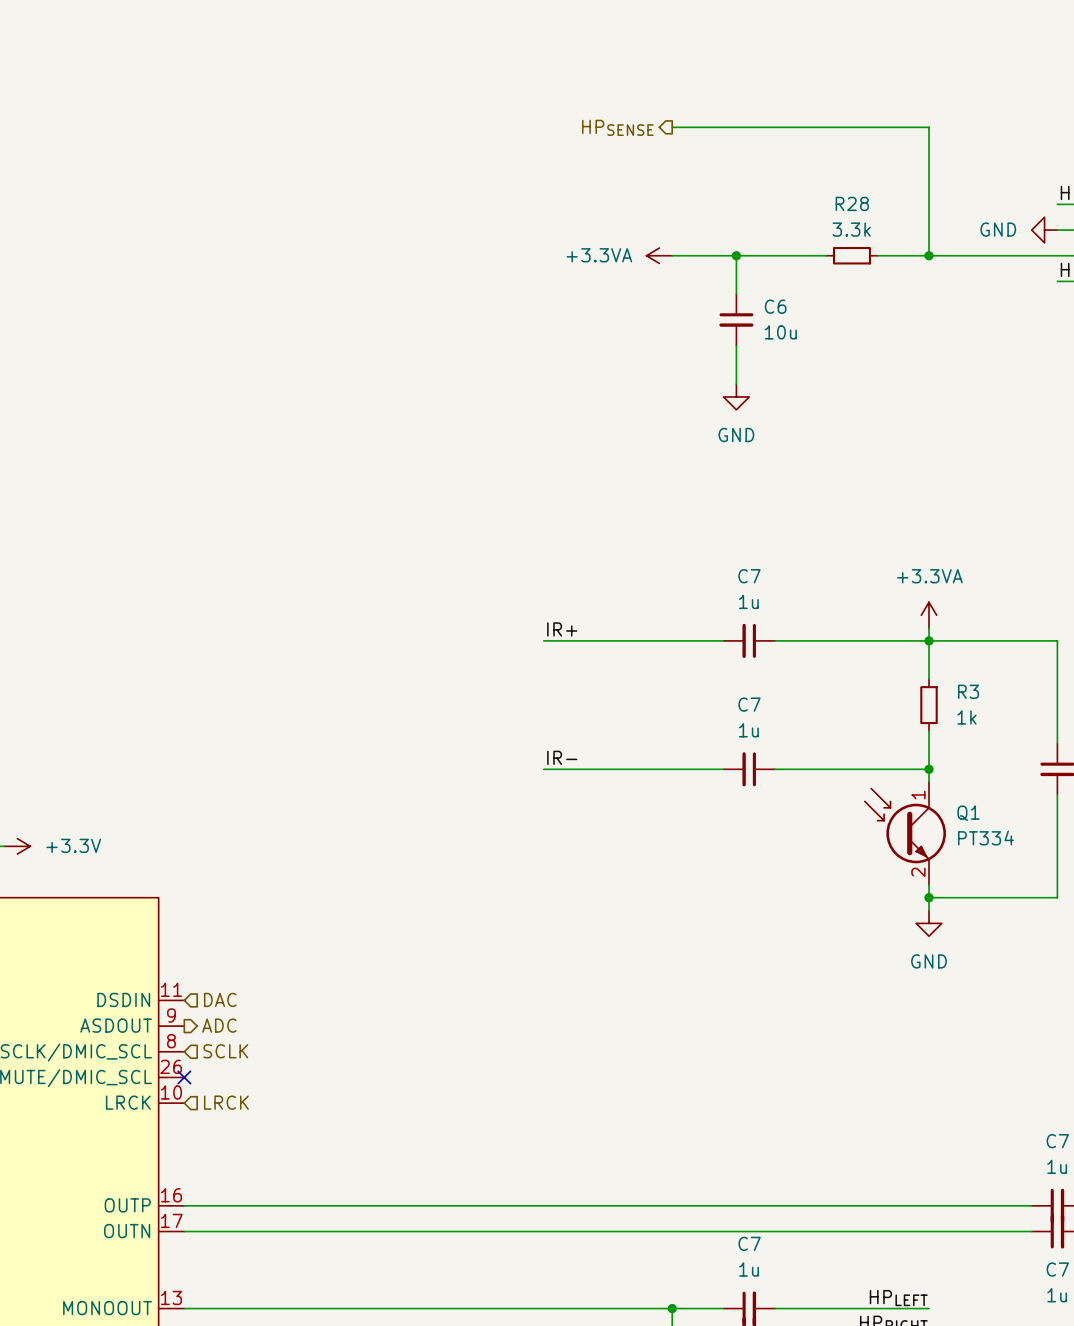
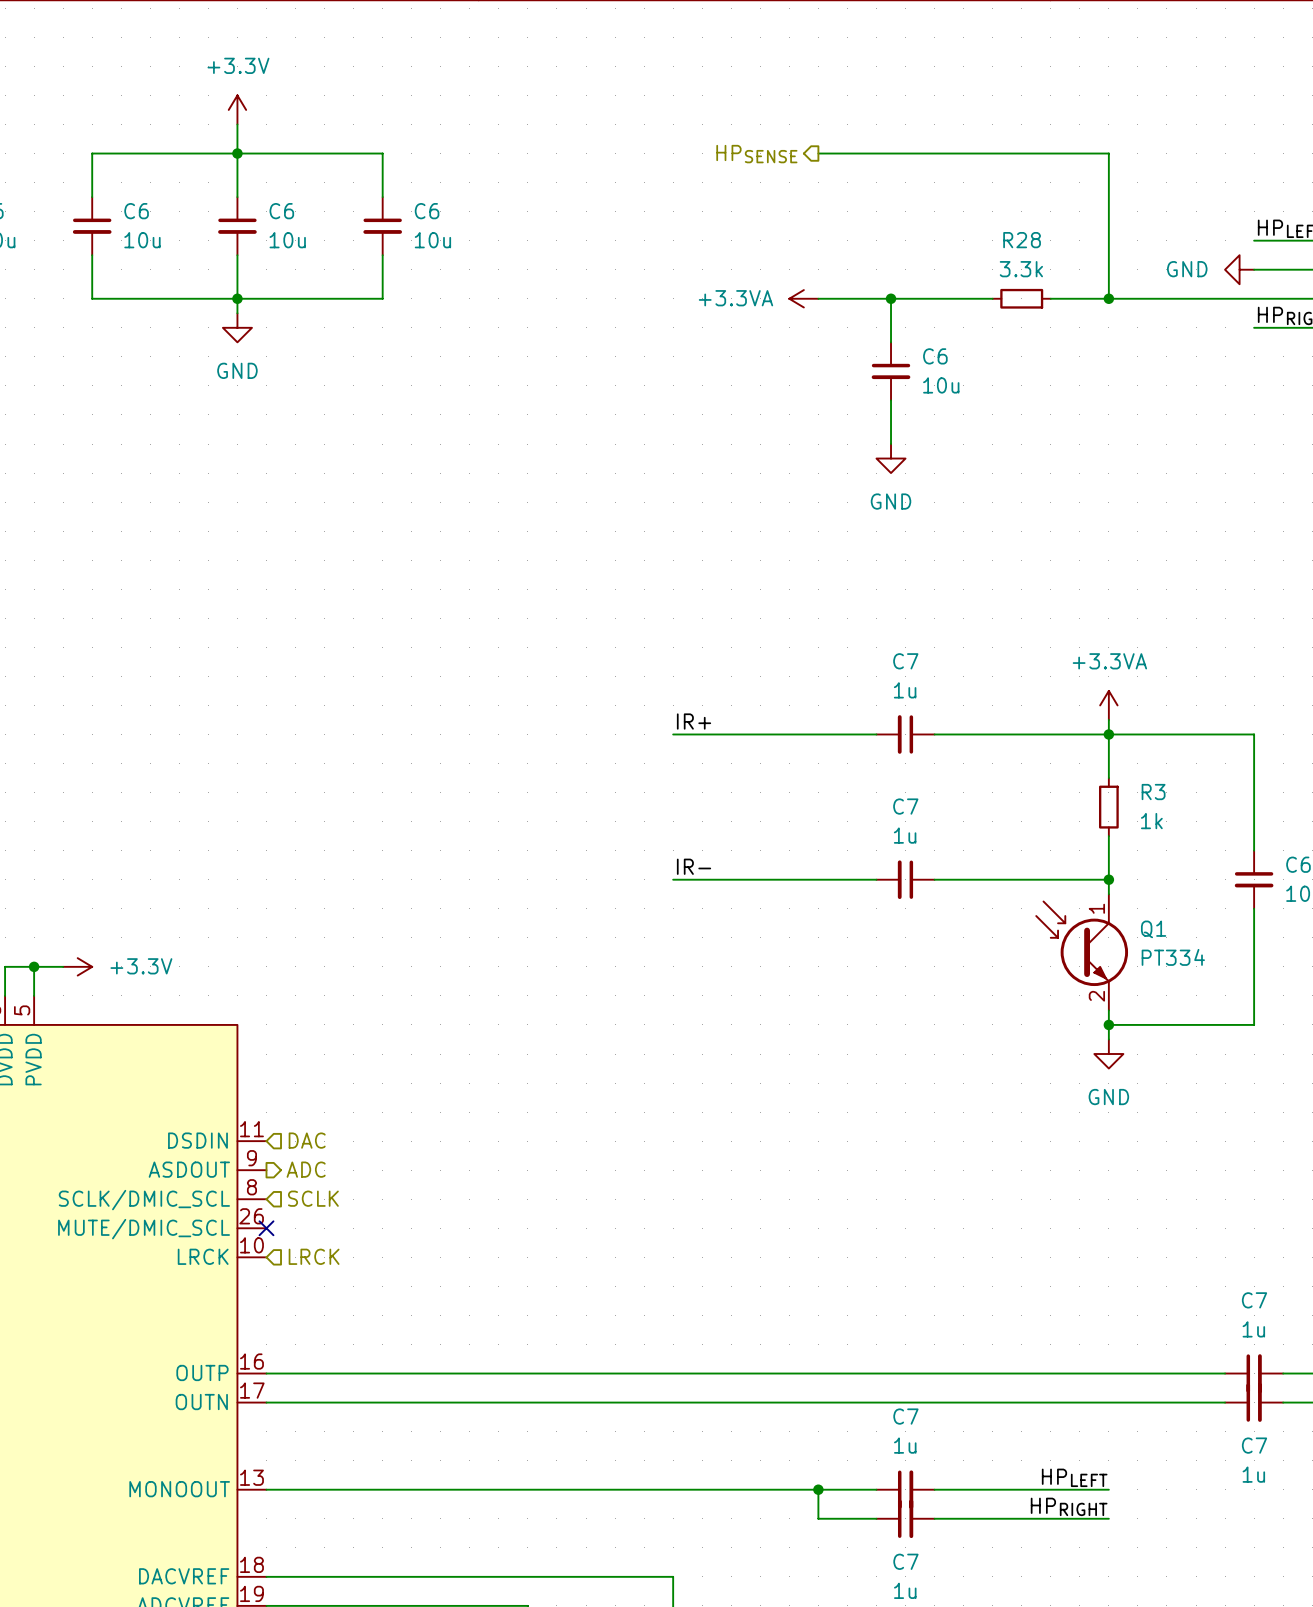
power symbol: none -> +3.3V (237, 109)
wire: none -> (237, 124) (237, 197)
junction: none -> (237, 153)
wire: none -> (92, 197) (92, 153) (382, 153) (382, 197)
C6: none -> 10u (92, 226)
C6: none -> 10u (237, 226)
C6: none -> 10u (382, 226)
wire: none -> (92, 255) (92, 298) (382, 298) (382, 255)
wire: none -> (237, 255) (237, 313)
junction: none -> (237, 298)
power symbol: none -> GND (237, 327)

